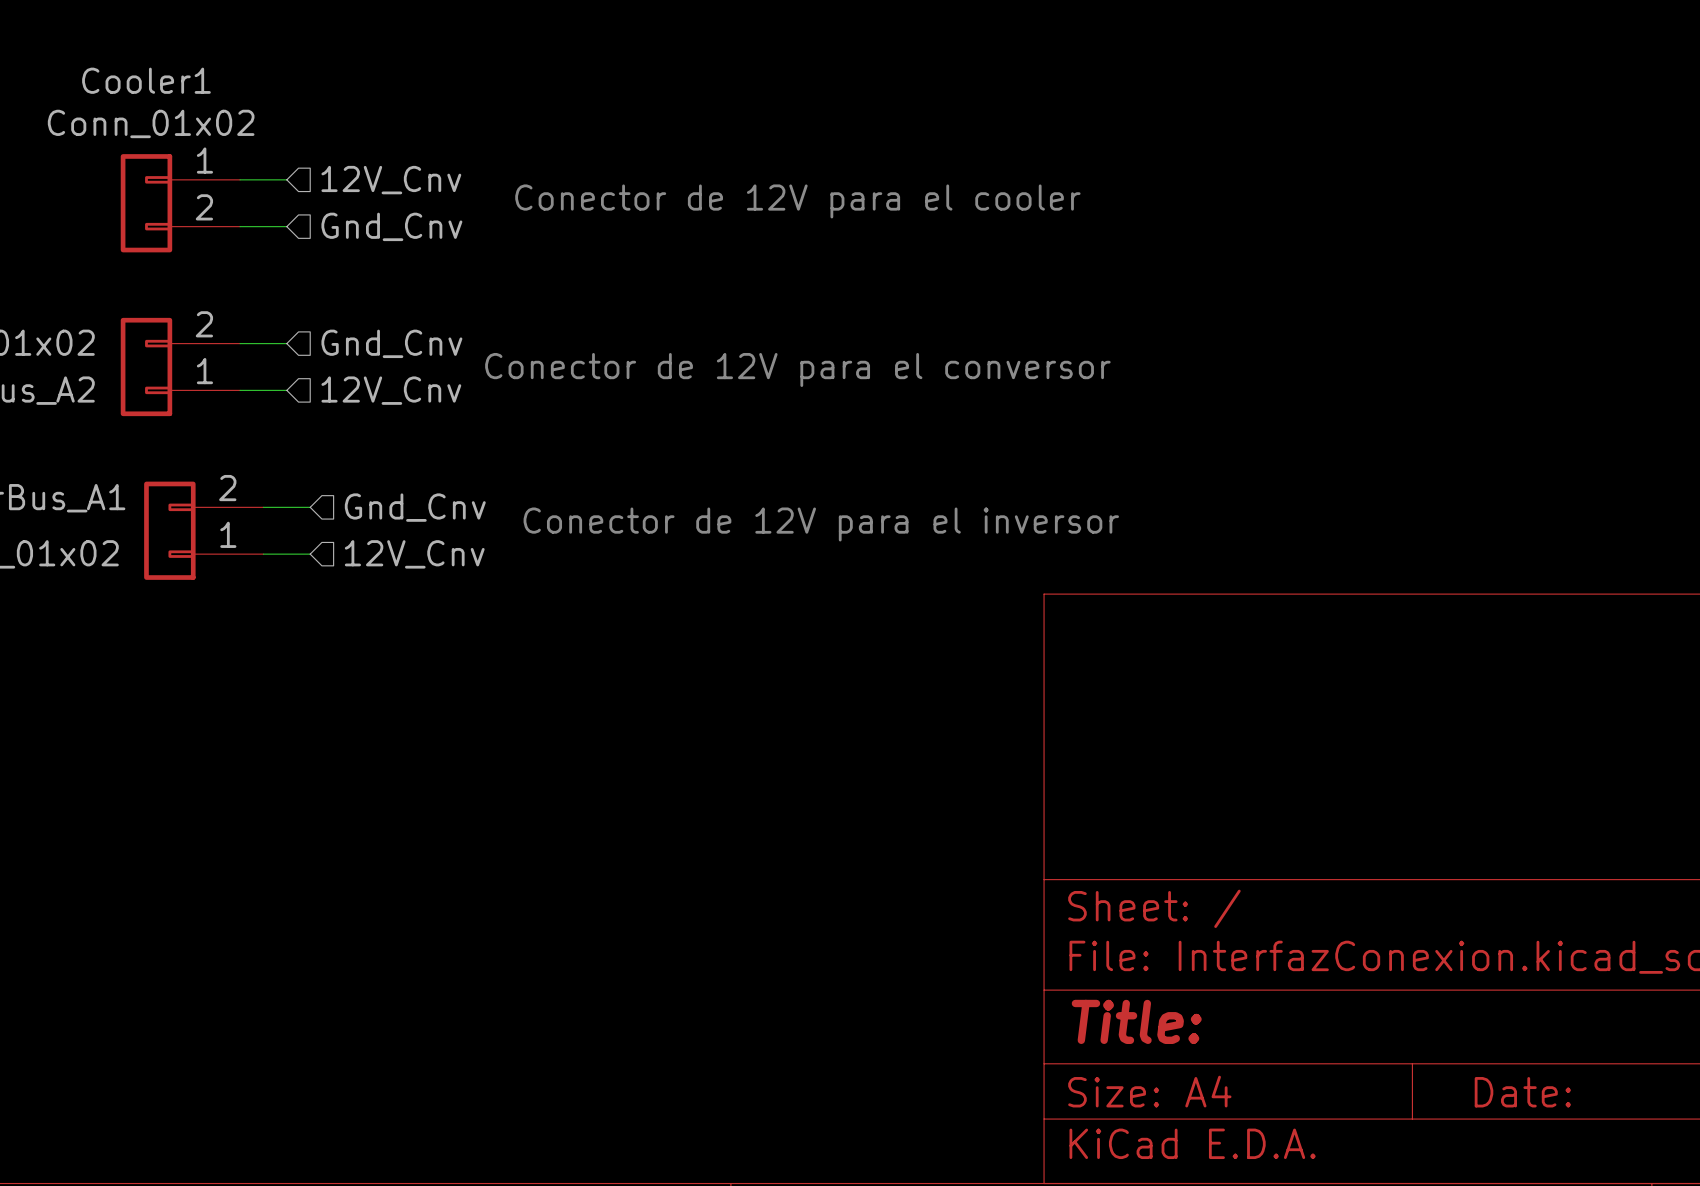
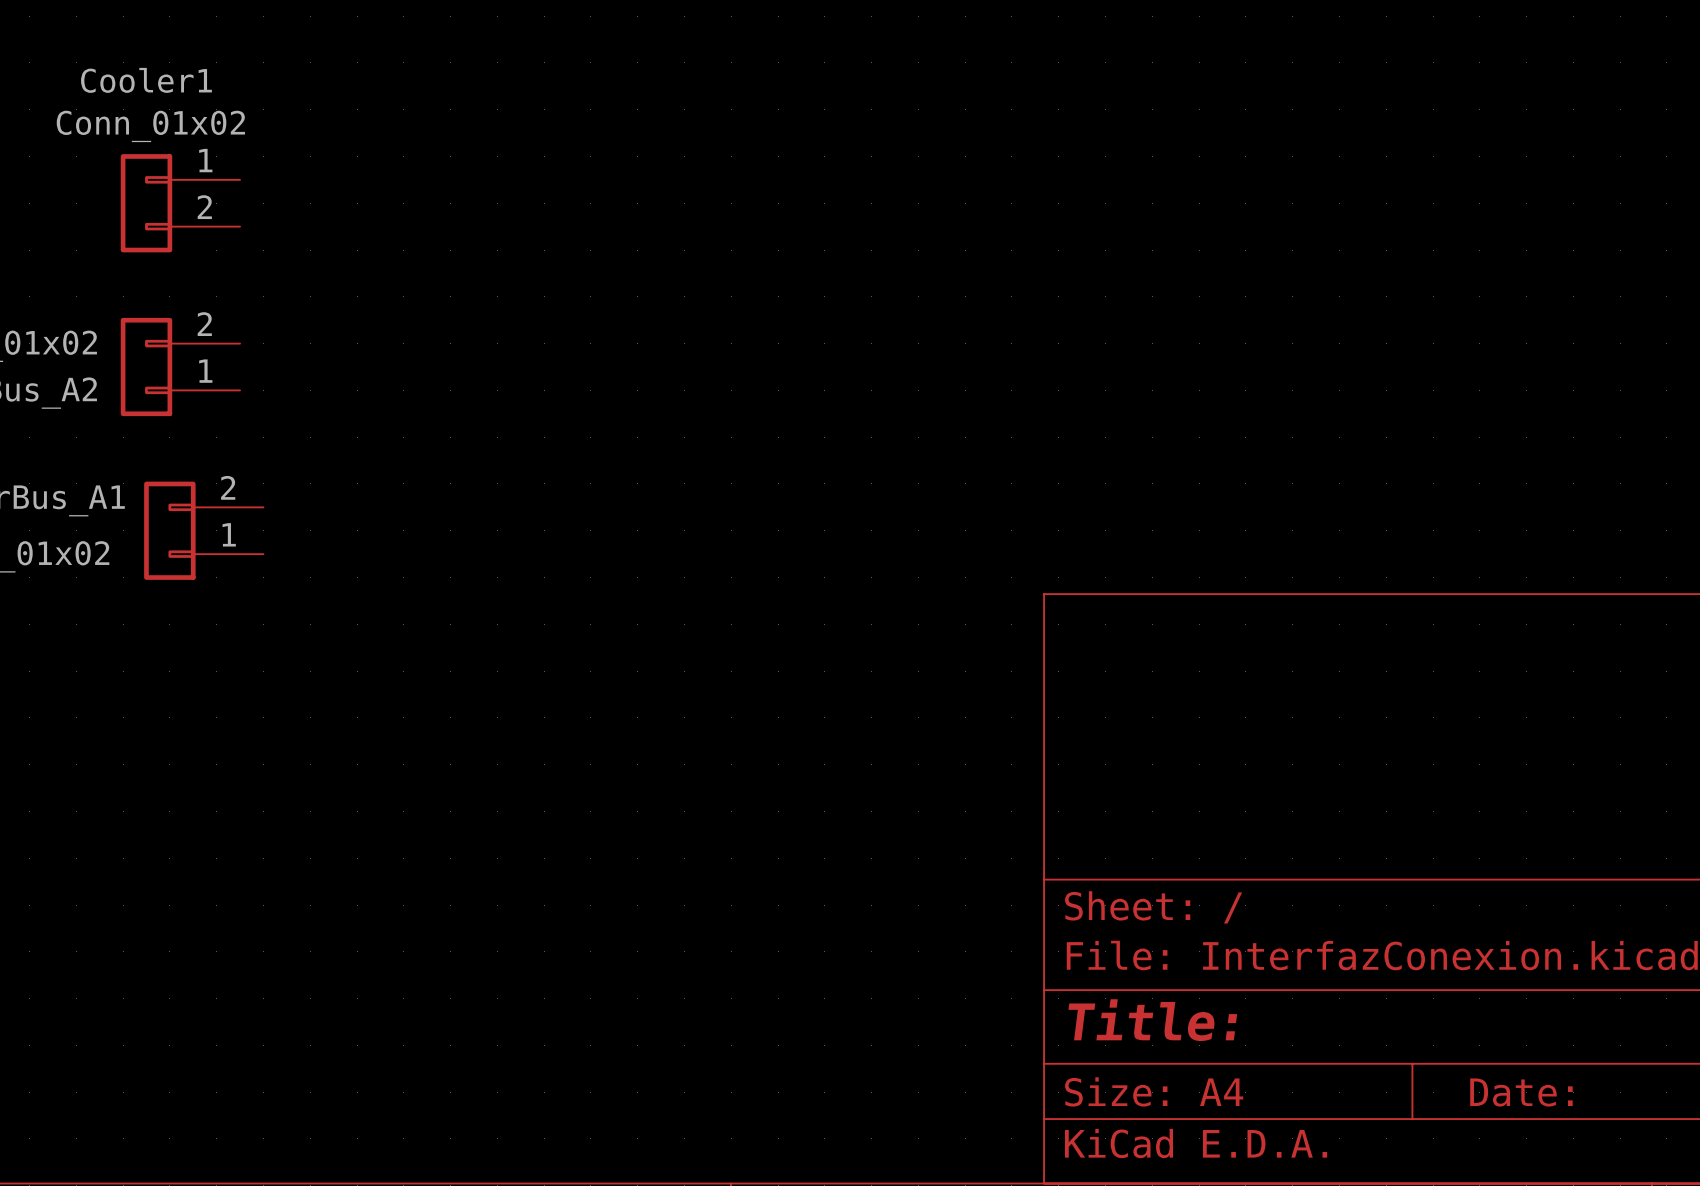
wire: (240, 179) (286, 179) -> none
hierarchical label: 12V_Cnv (391, 180) -> none
text: Conector de 12V para el cooler (797, 201) -> none
wire: (240, 226) (286, 226) -> none
hierarchical label: Gnd_Cnv (391, 226) -> none
wire: (240, 343) (286, 343) -> none
hierarchical label: Gnd_Cnv (391, 343) -> none
text: Conector de 12V para el conversor (797, 369) -> none
wire: (240, 390) (286, 390) -> none
hierarchical label: 12V_Cnv (391, 390) -> none
wire: (263, 507) (310, 507) -> none
hierarchical label: Gnd_Cnv (415, 507) -> none
text: Conector de 12V para el inversor (821, 524) -> none
wire: (263, 554) (310, 554) -> none
hierarchical label: 12V_Cnv (414, 554) -> none

